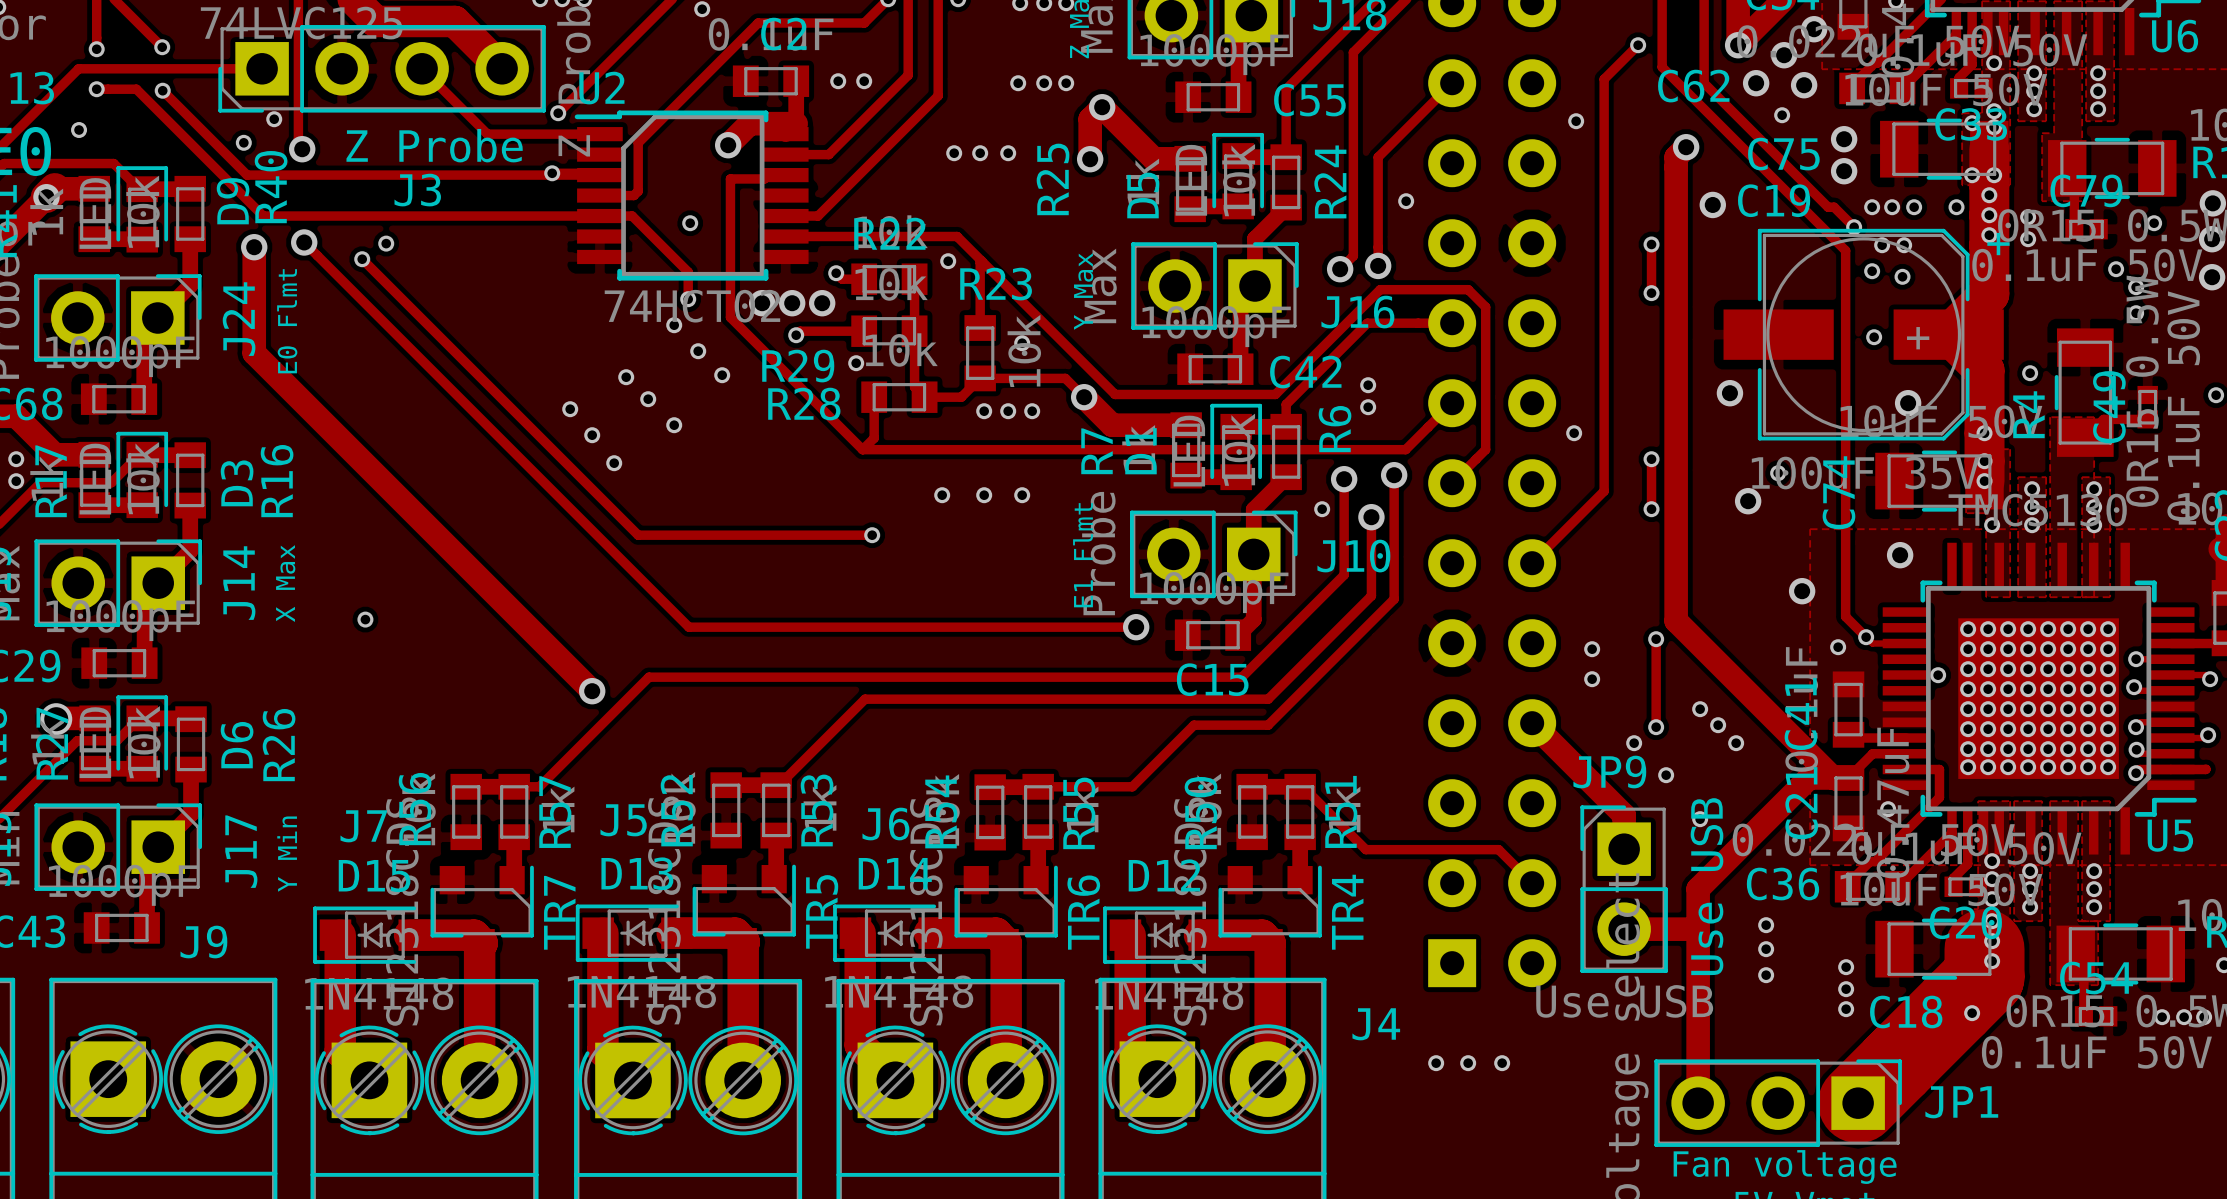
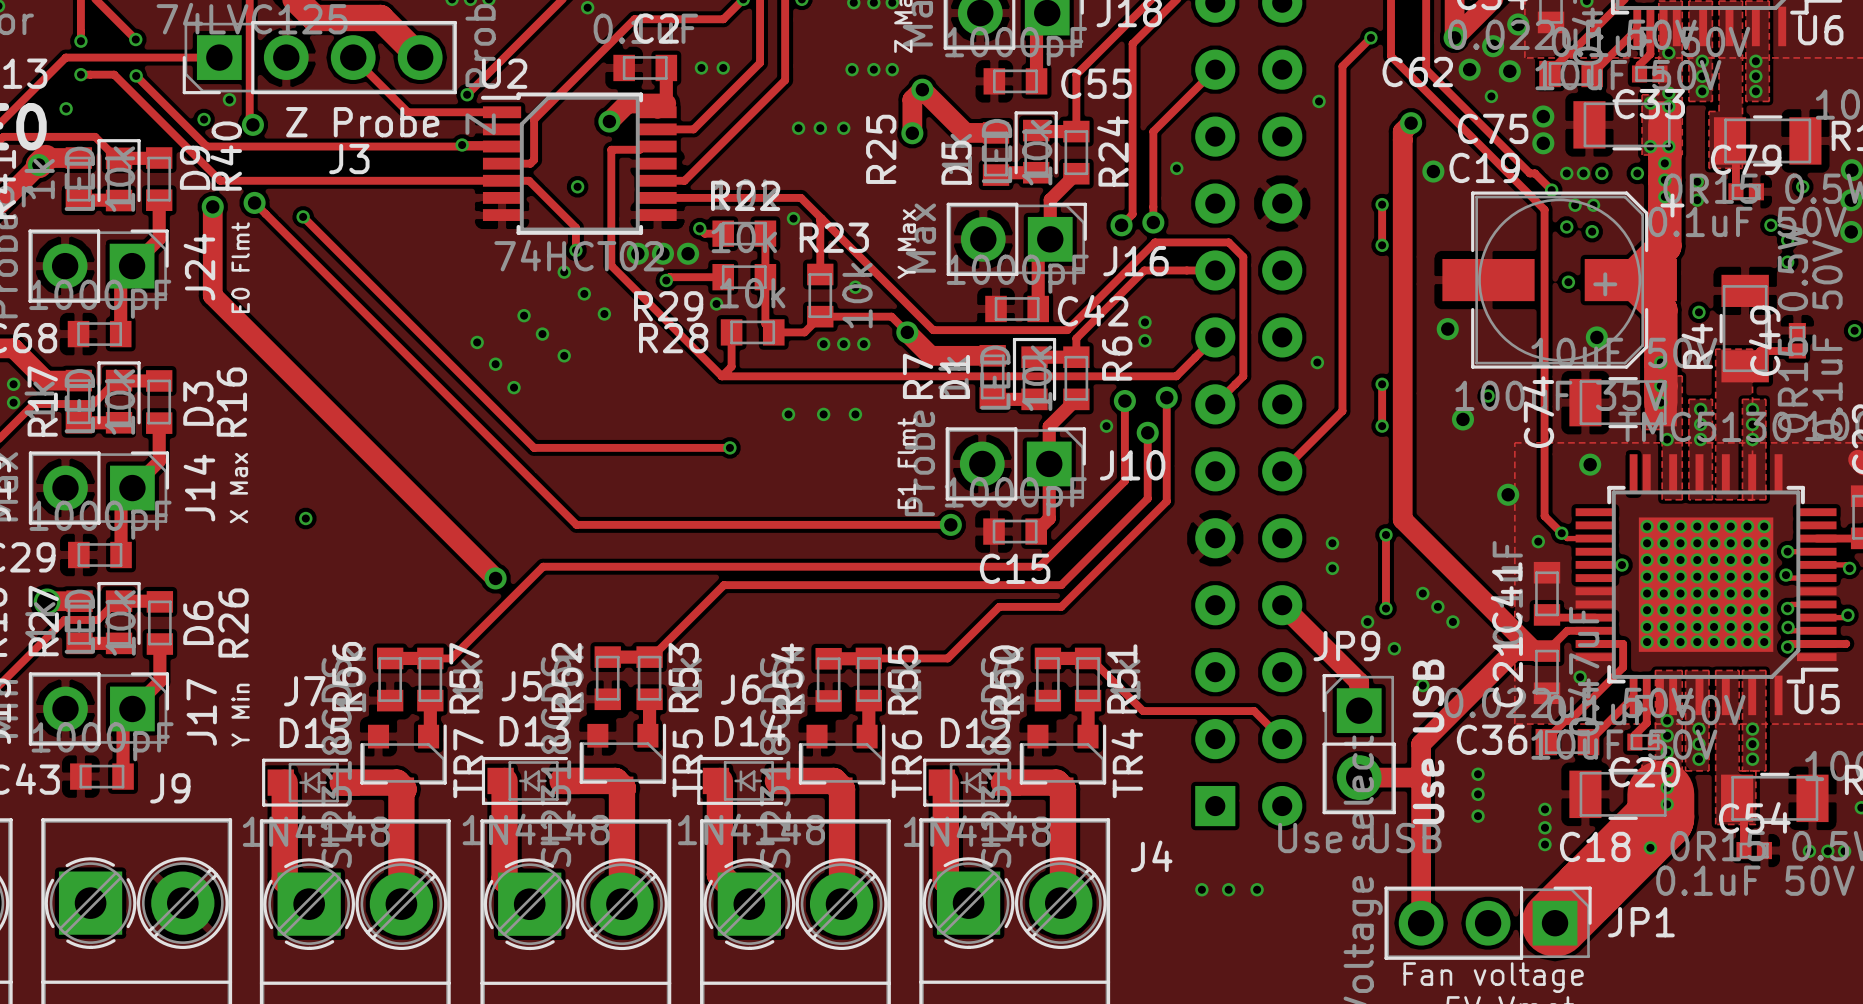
via: (386, 243) -> none

